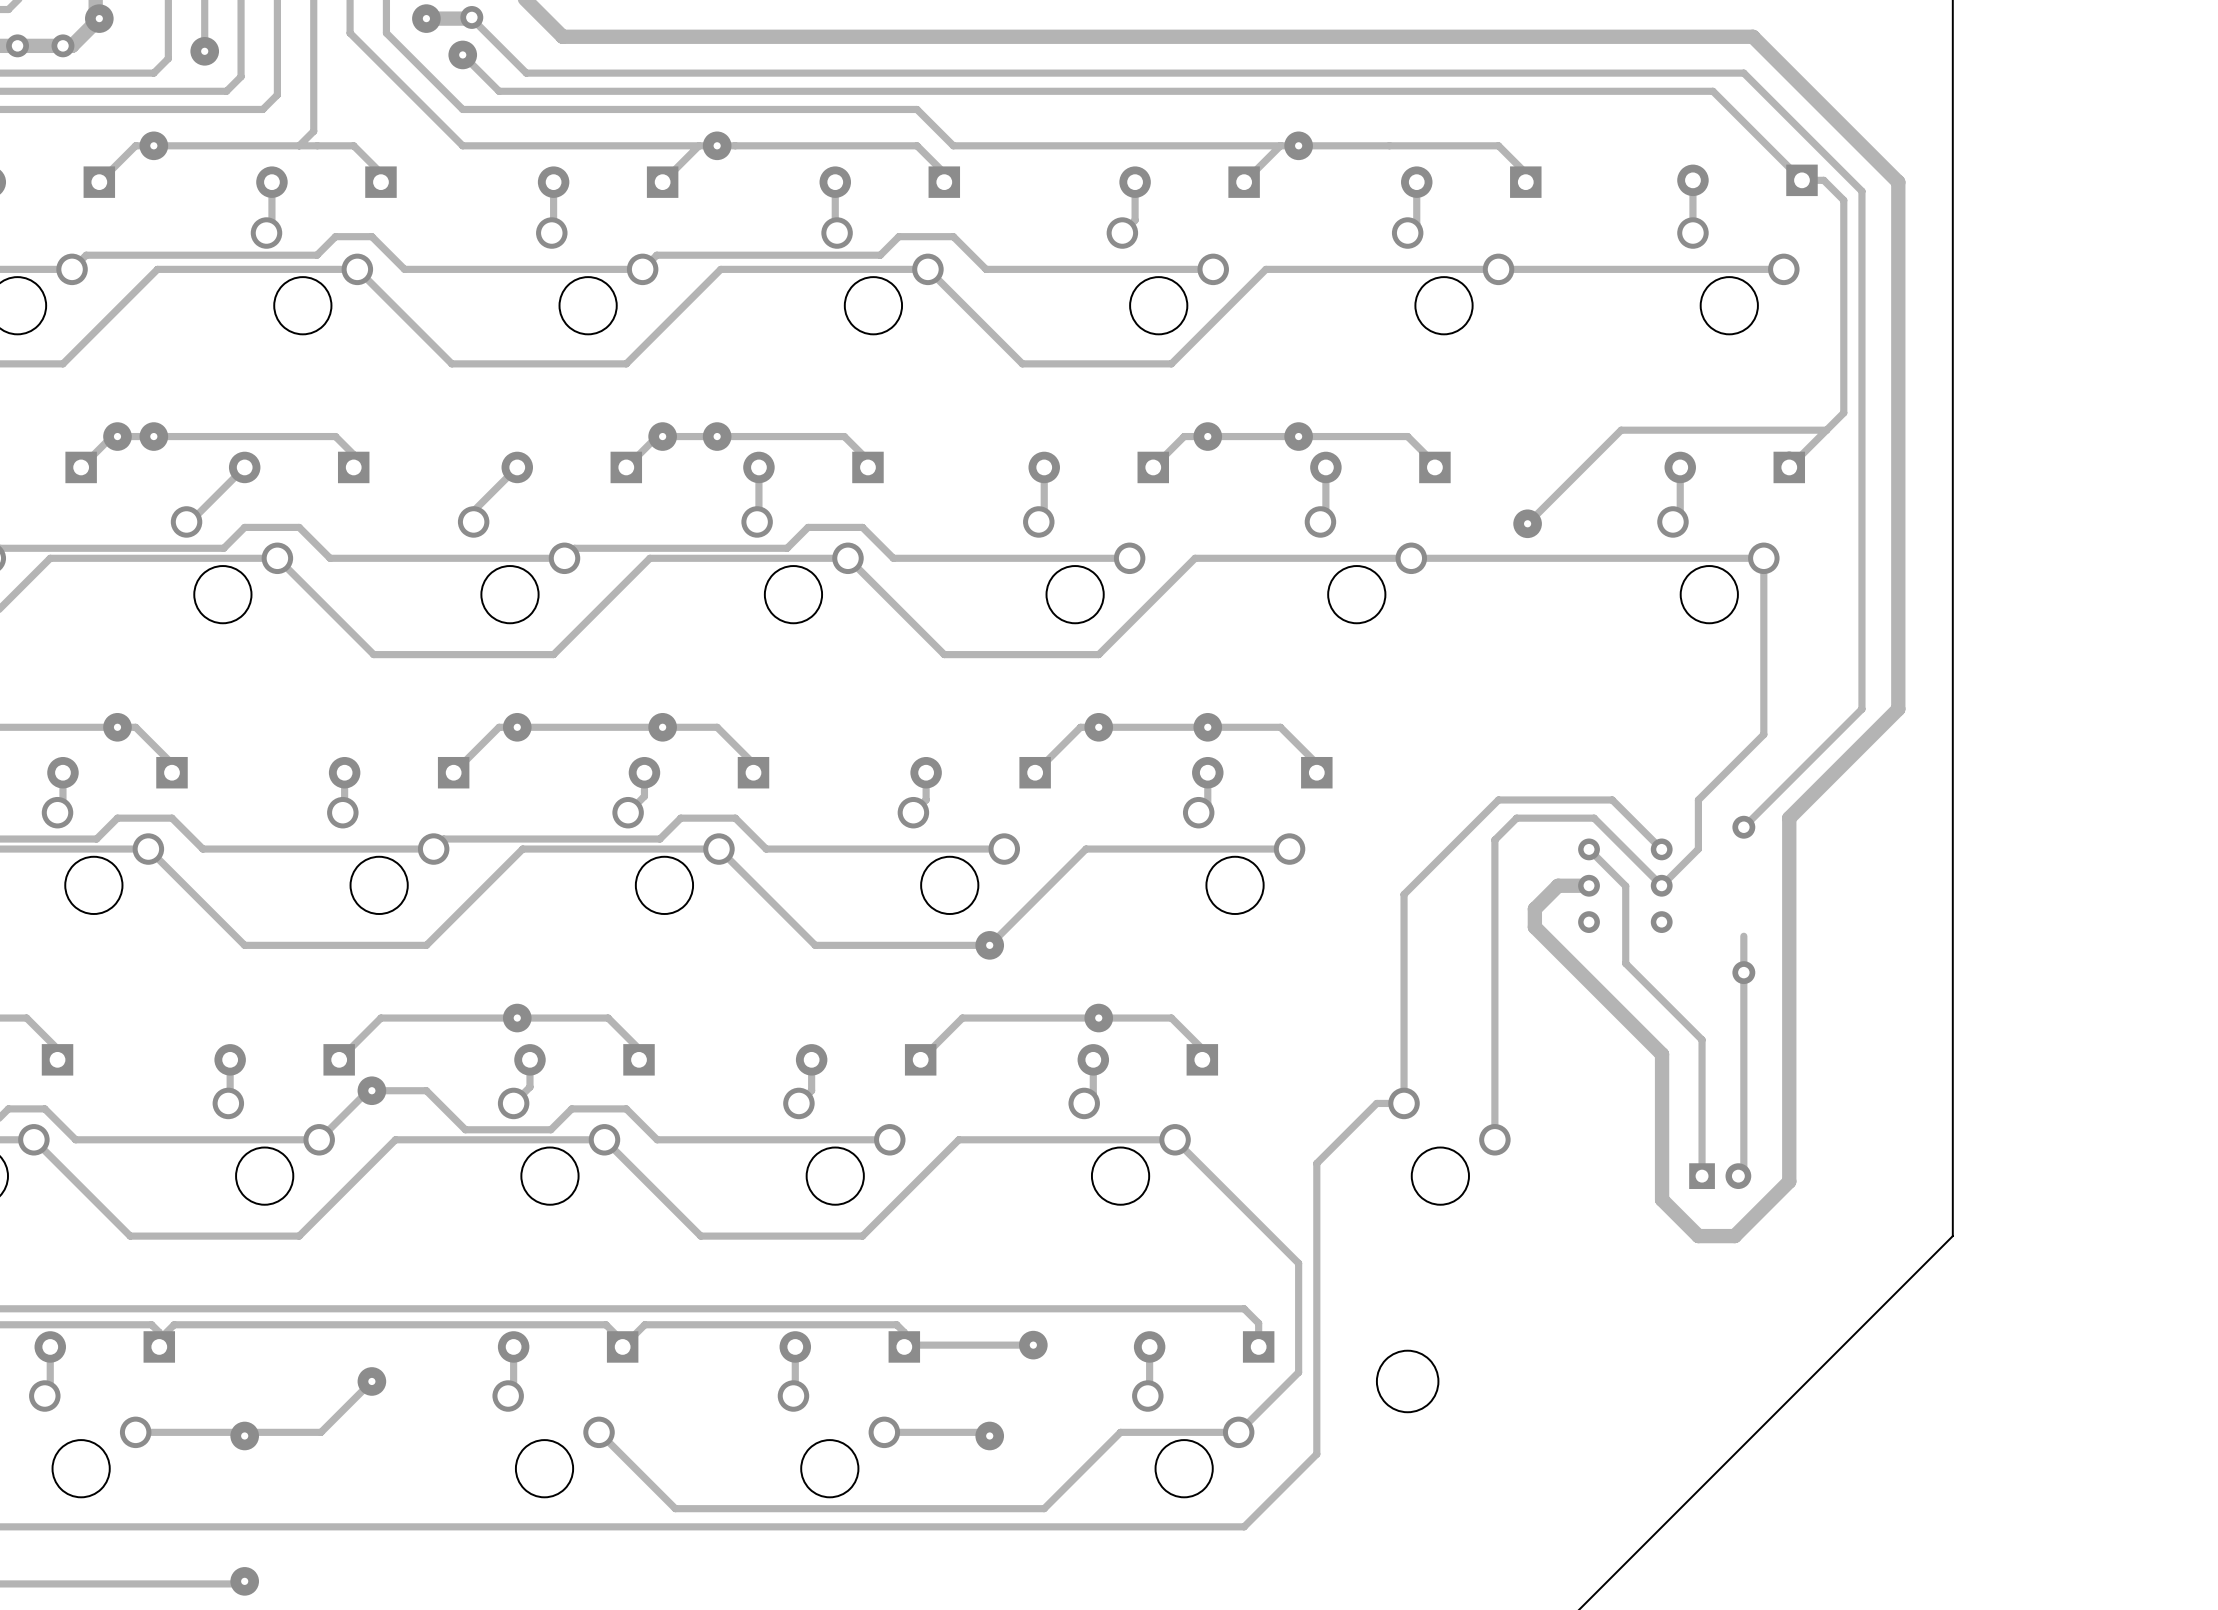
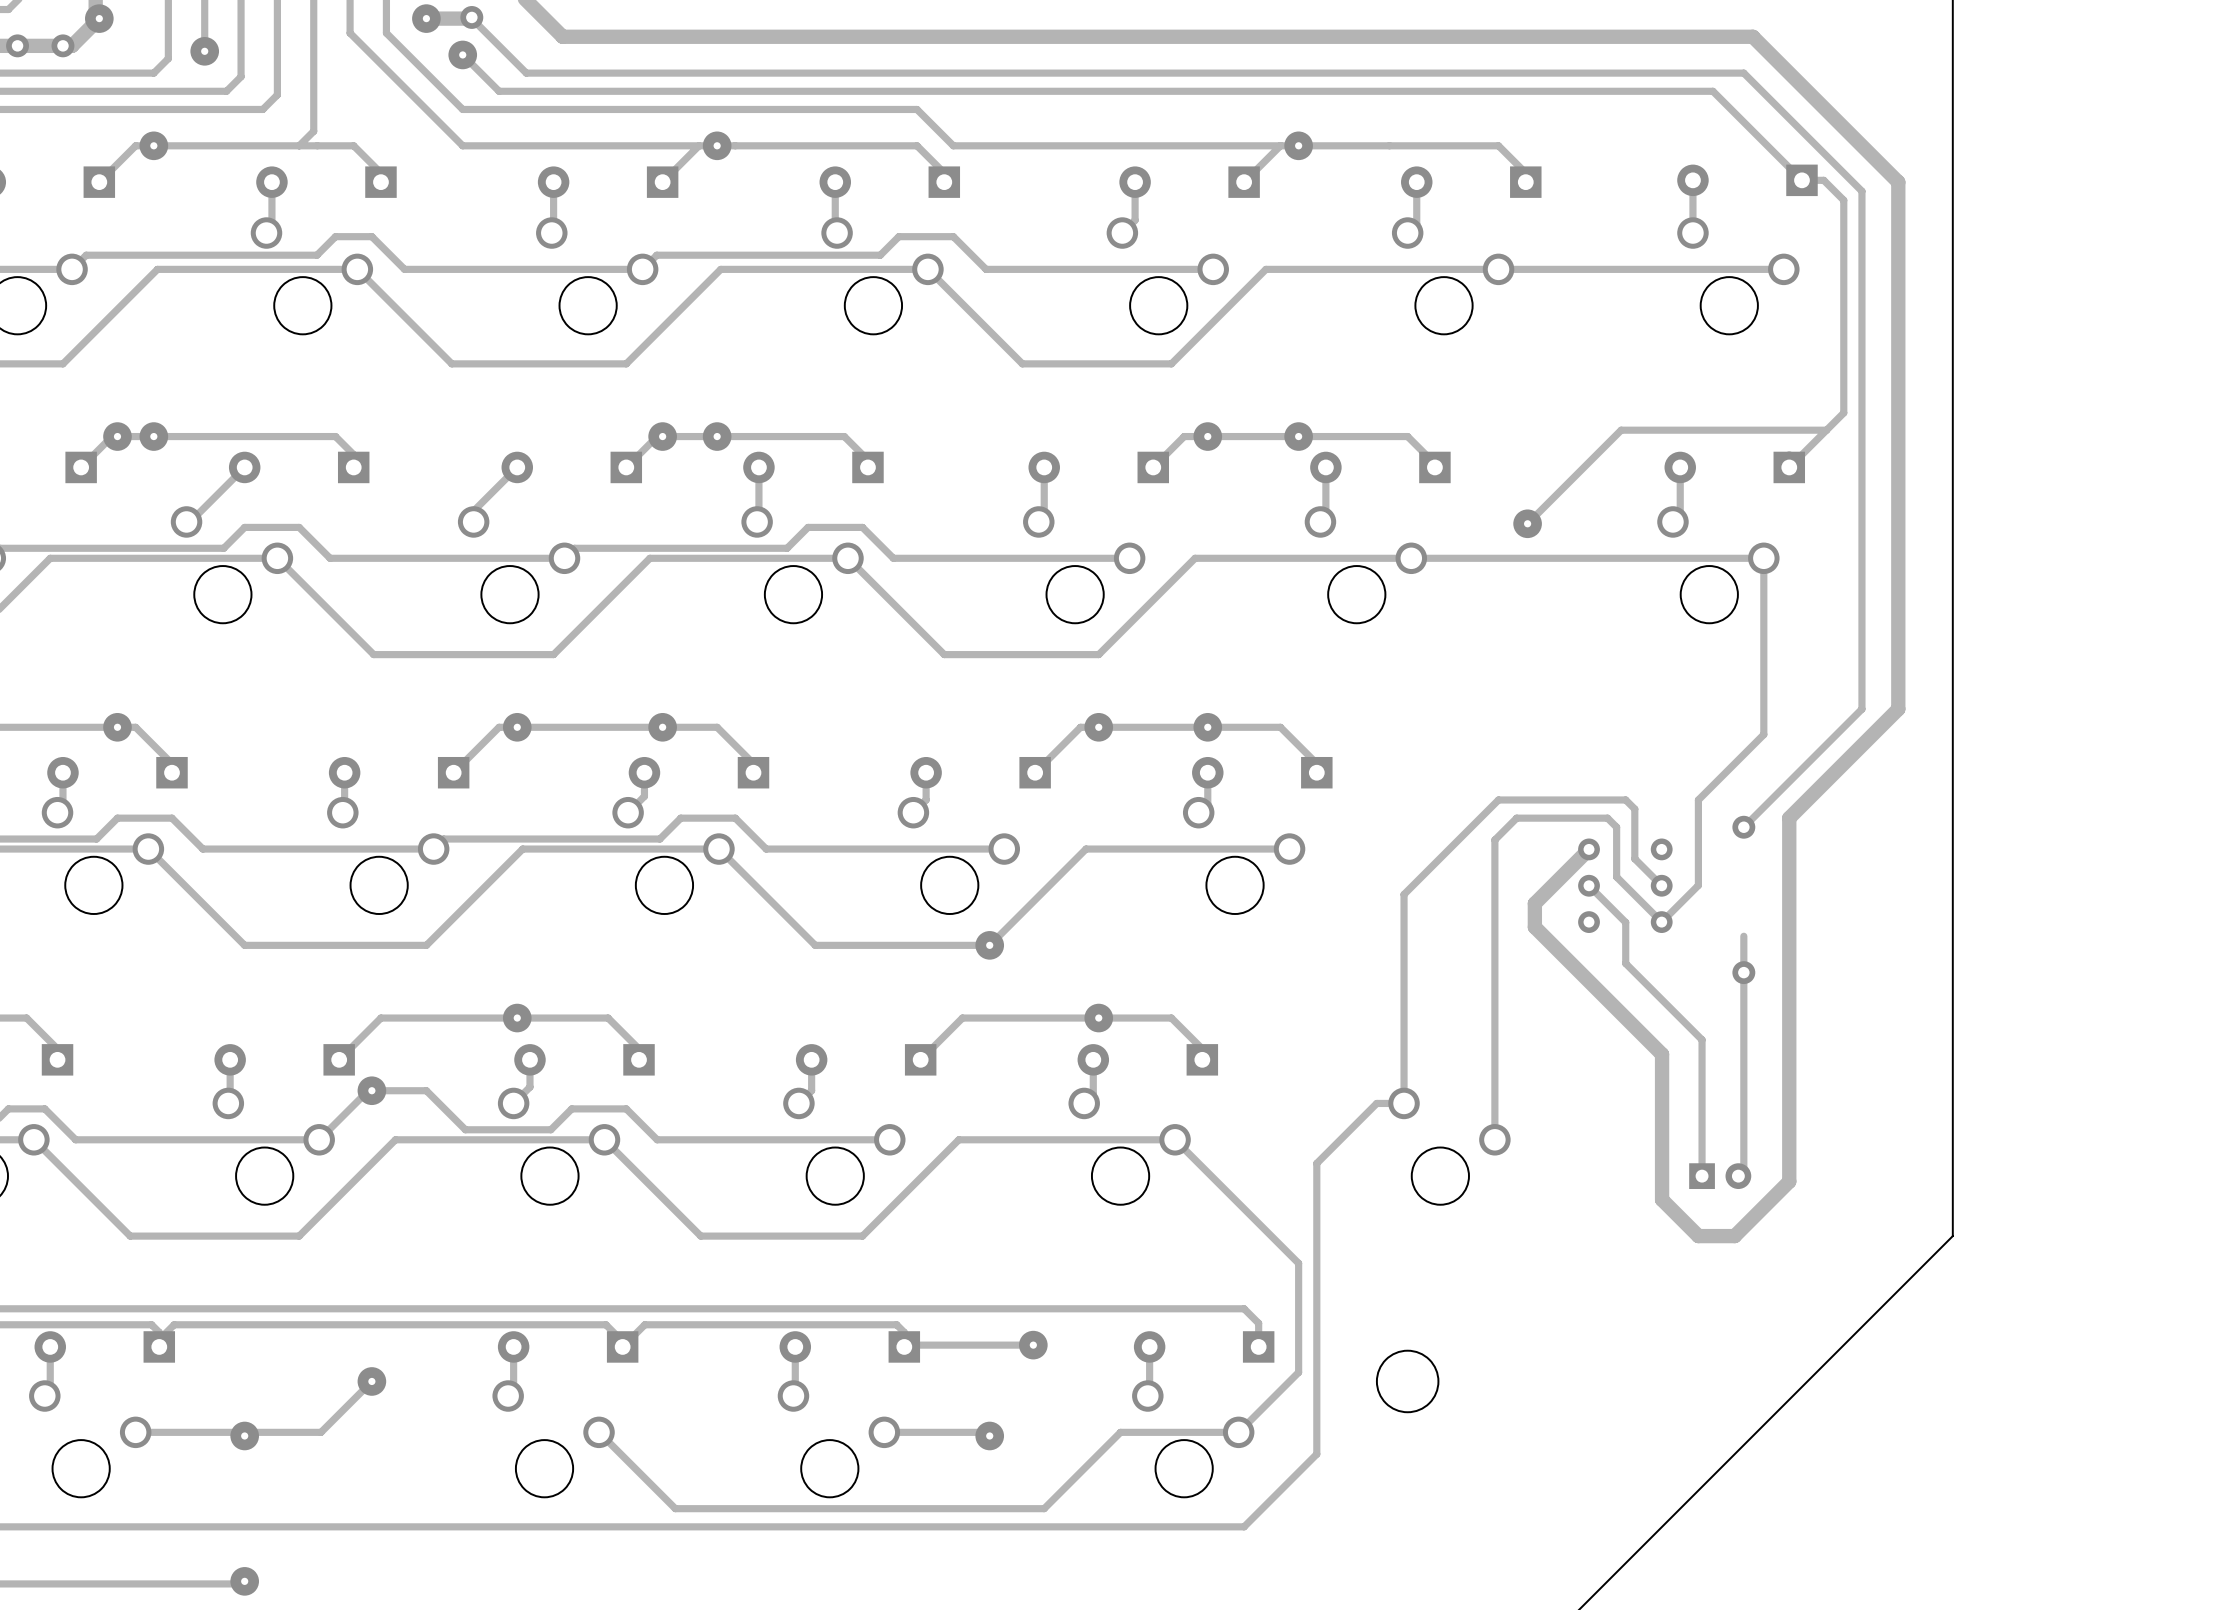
track: (1612, 799) (1661, 849) -> none
track: (1594, 818) (1634, 858) -> (1612, 799) (1625, 799) (1634, 809) (1634, 858)
track: (1589, 849) (1616, 877) -> (1594, 818) (1607, 818) (1616, 827) (1616, 877)
track: (1698, 849) (1661, 885) -> (1698, 849) (1698, 885) (1661, 922) (1625, 886)
track: (1589, 885) (1558, 885) (1534, 909) -> (1589, 849) (1534, 903) (1534, 909)
track: (1625, 886) (1625, 922) -> (1589, 885) (1625, 922)

